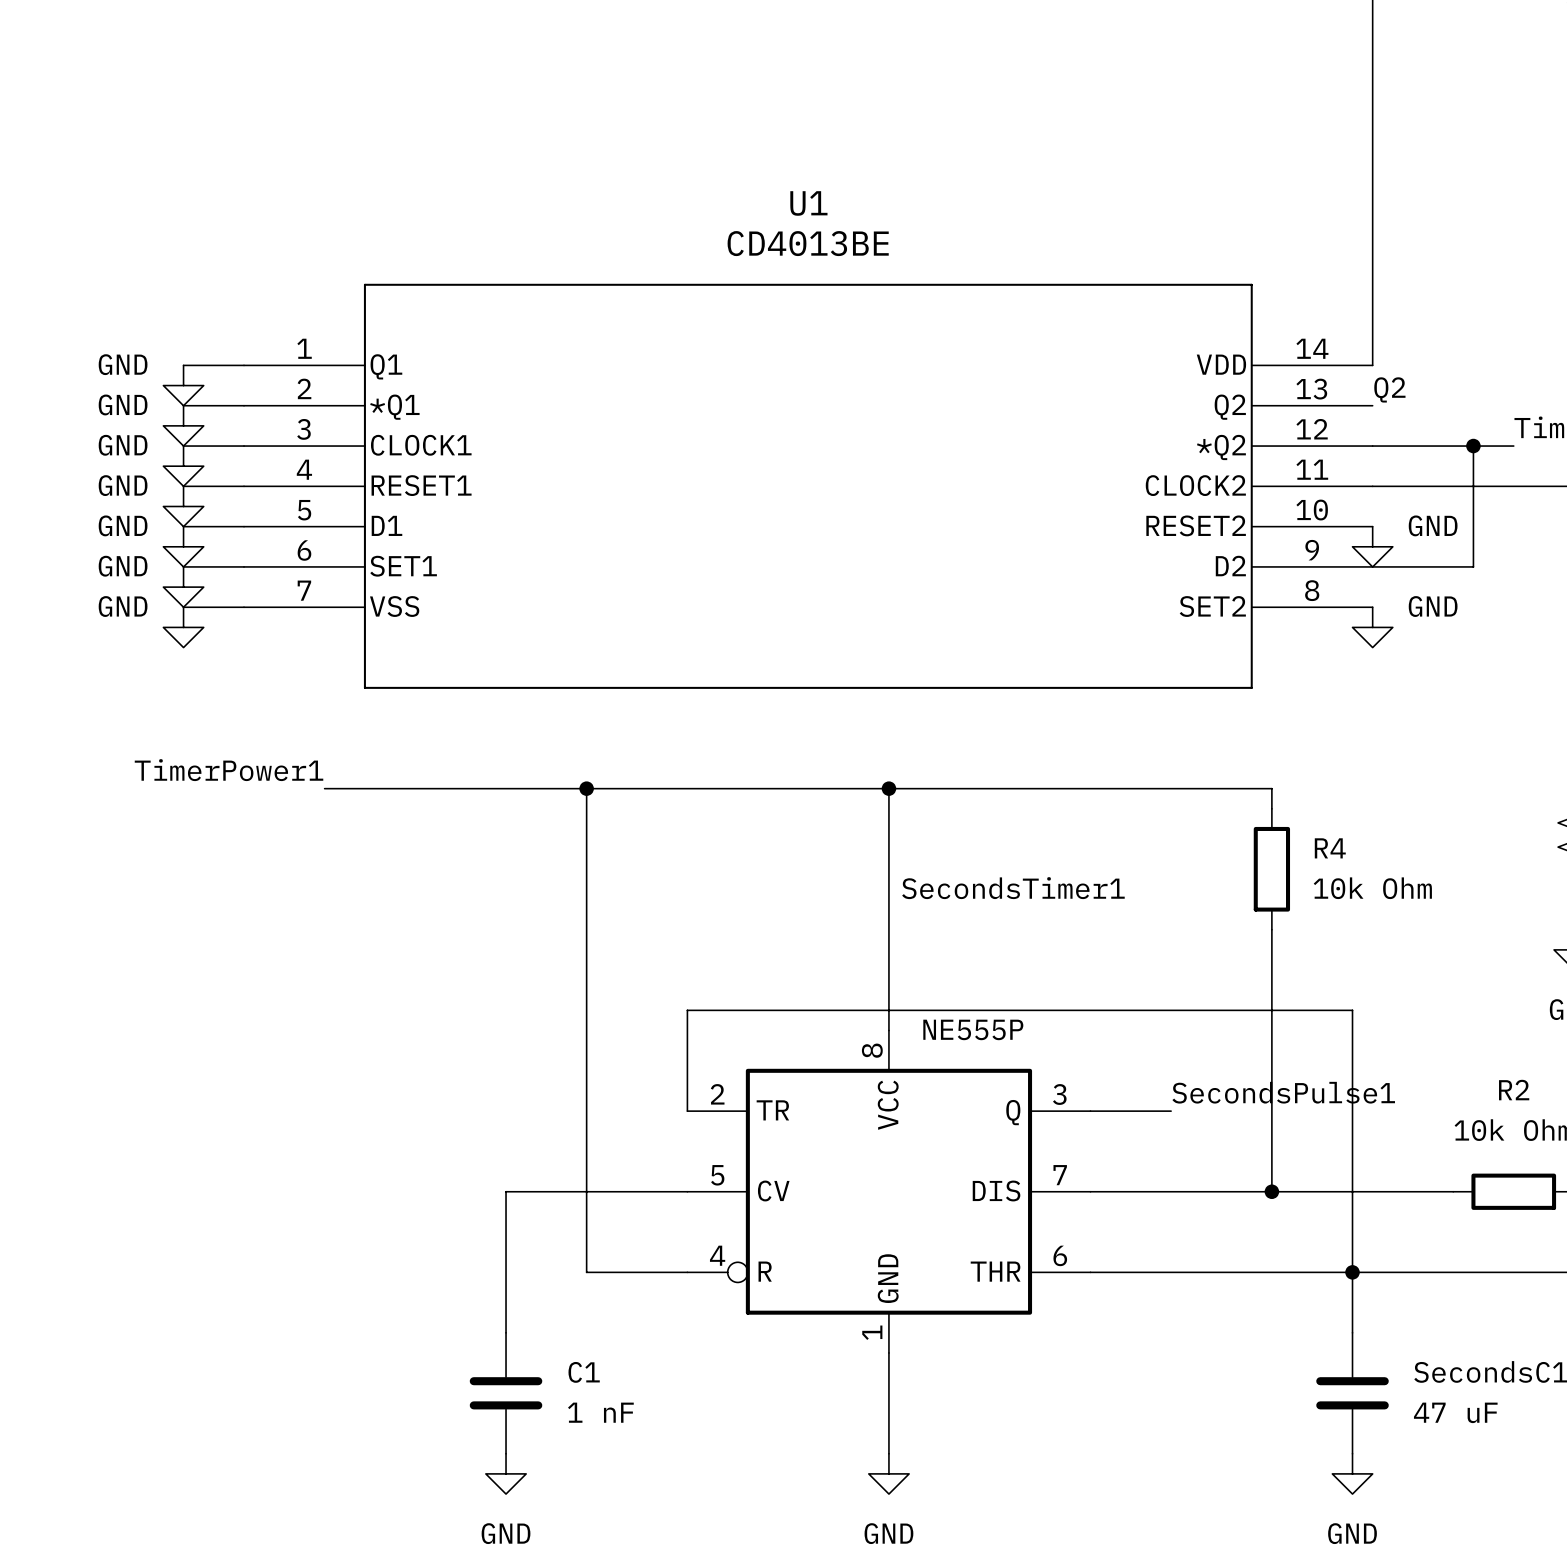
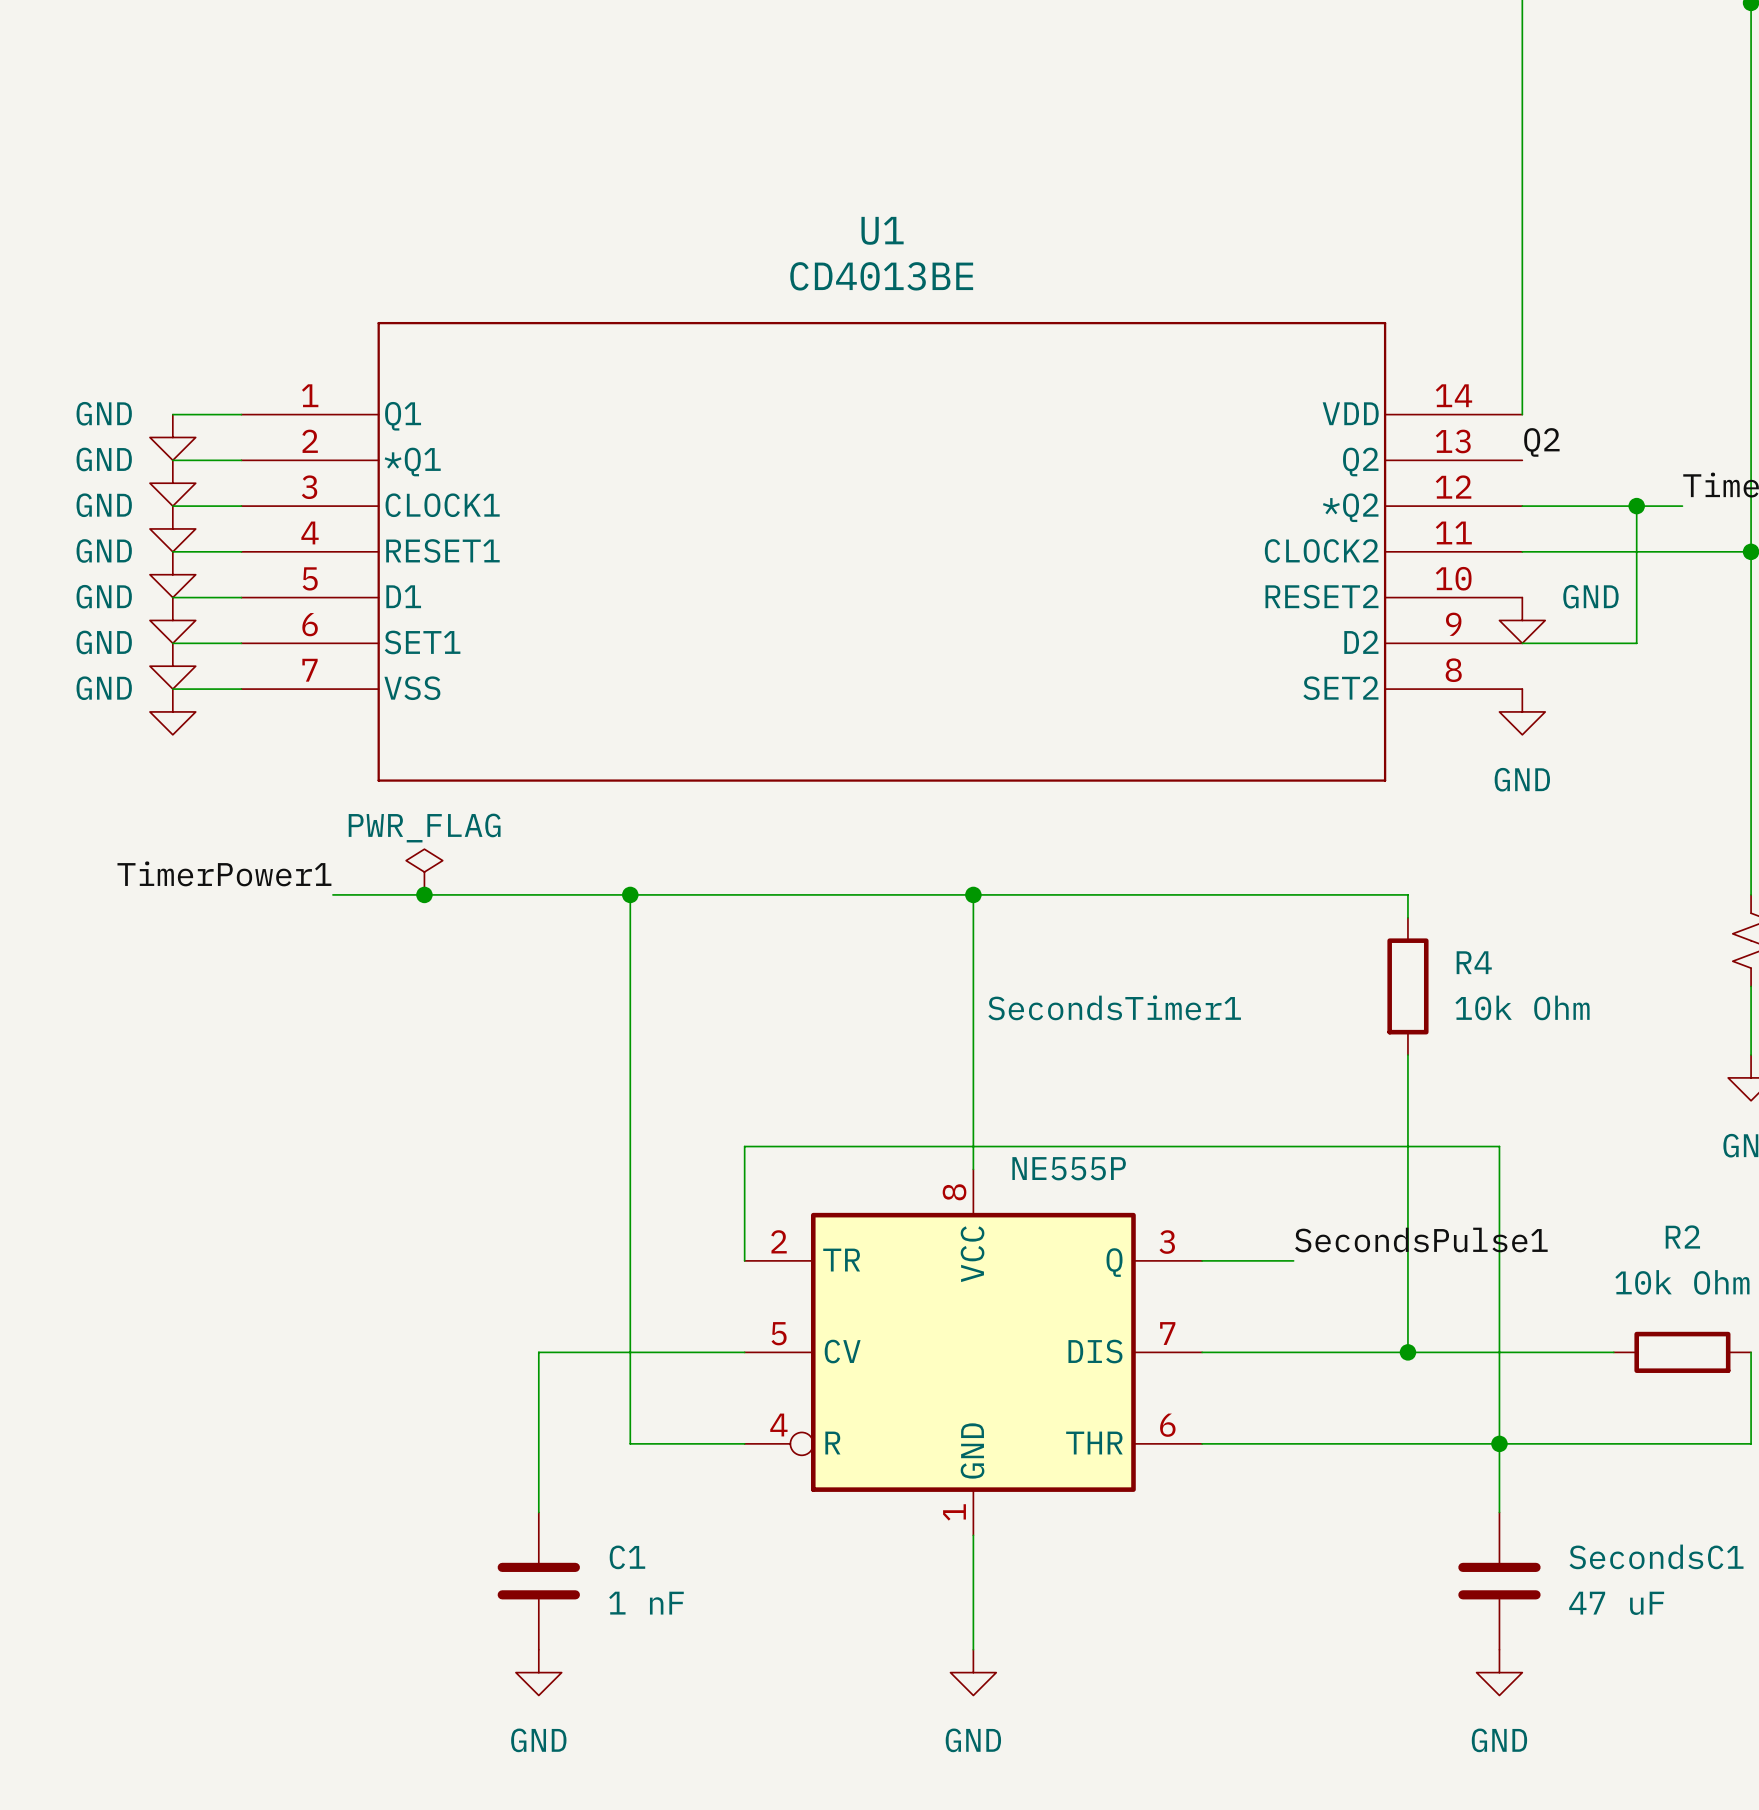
power symbol text position: GND (1433, 606) -> GND (1522, 779)
power symbol: none -> PWR_FLAG (424, 872)
junction: none -> (424, 894)

